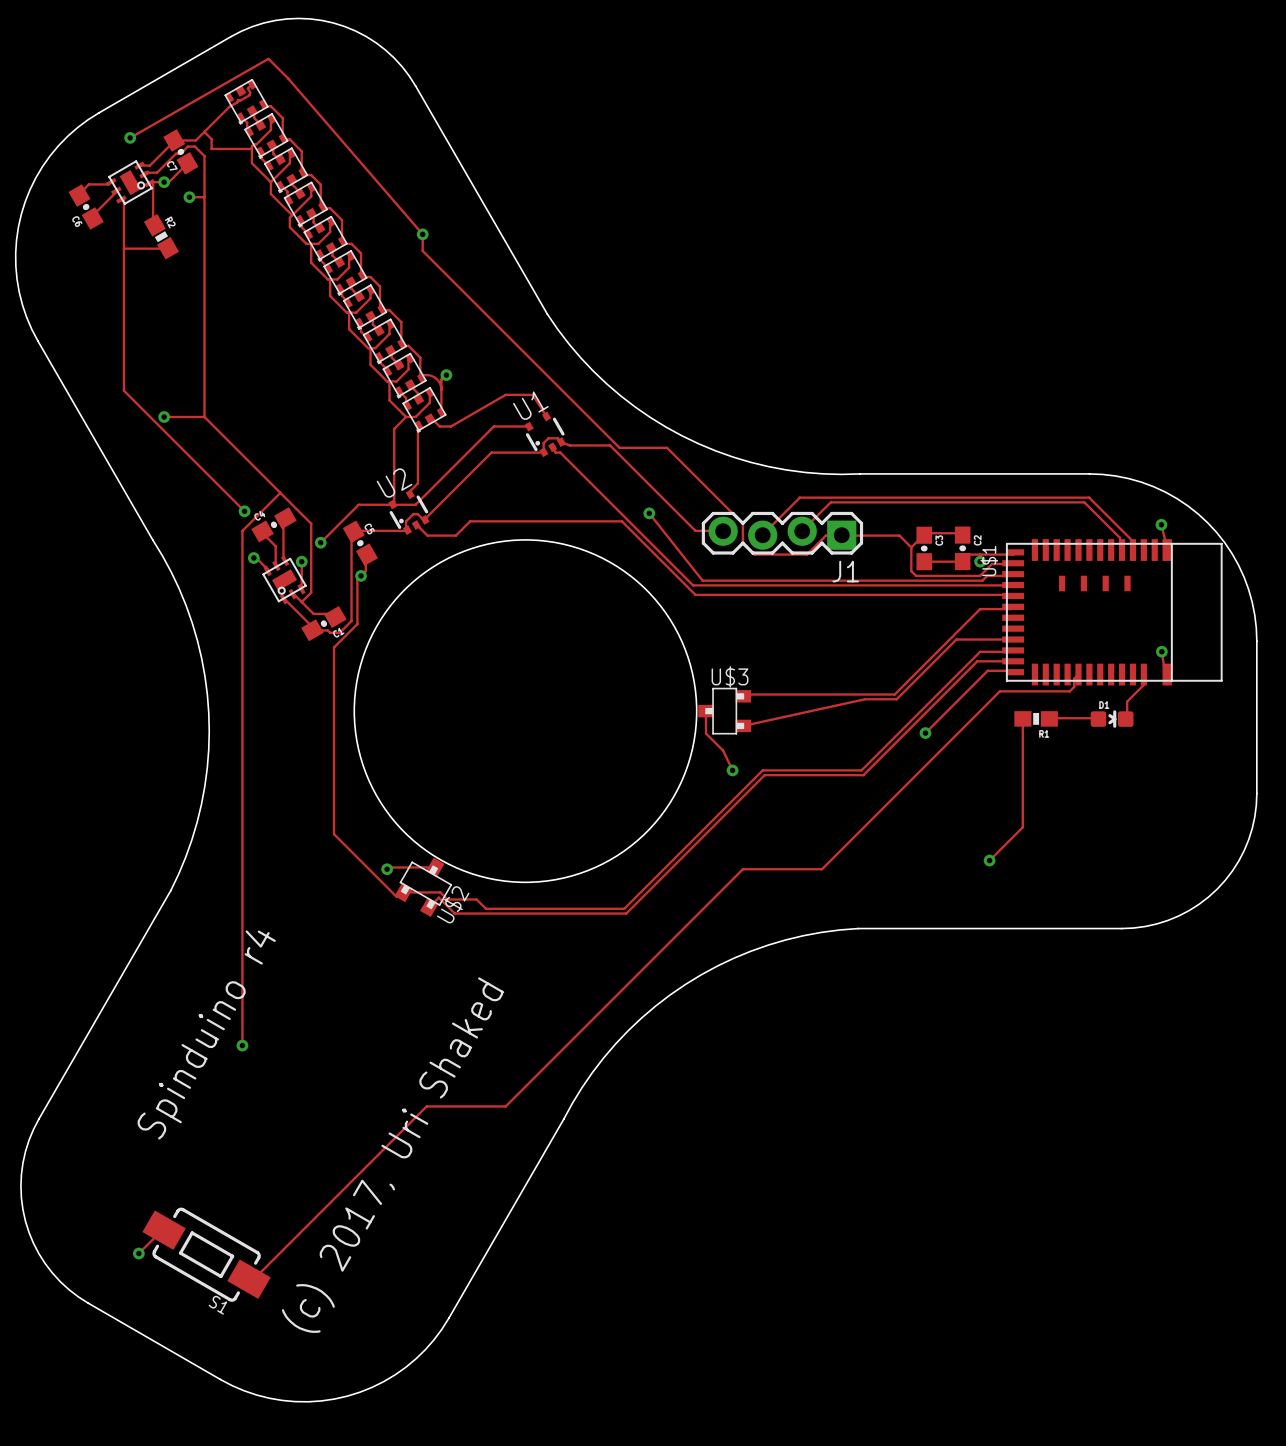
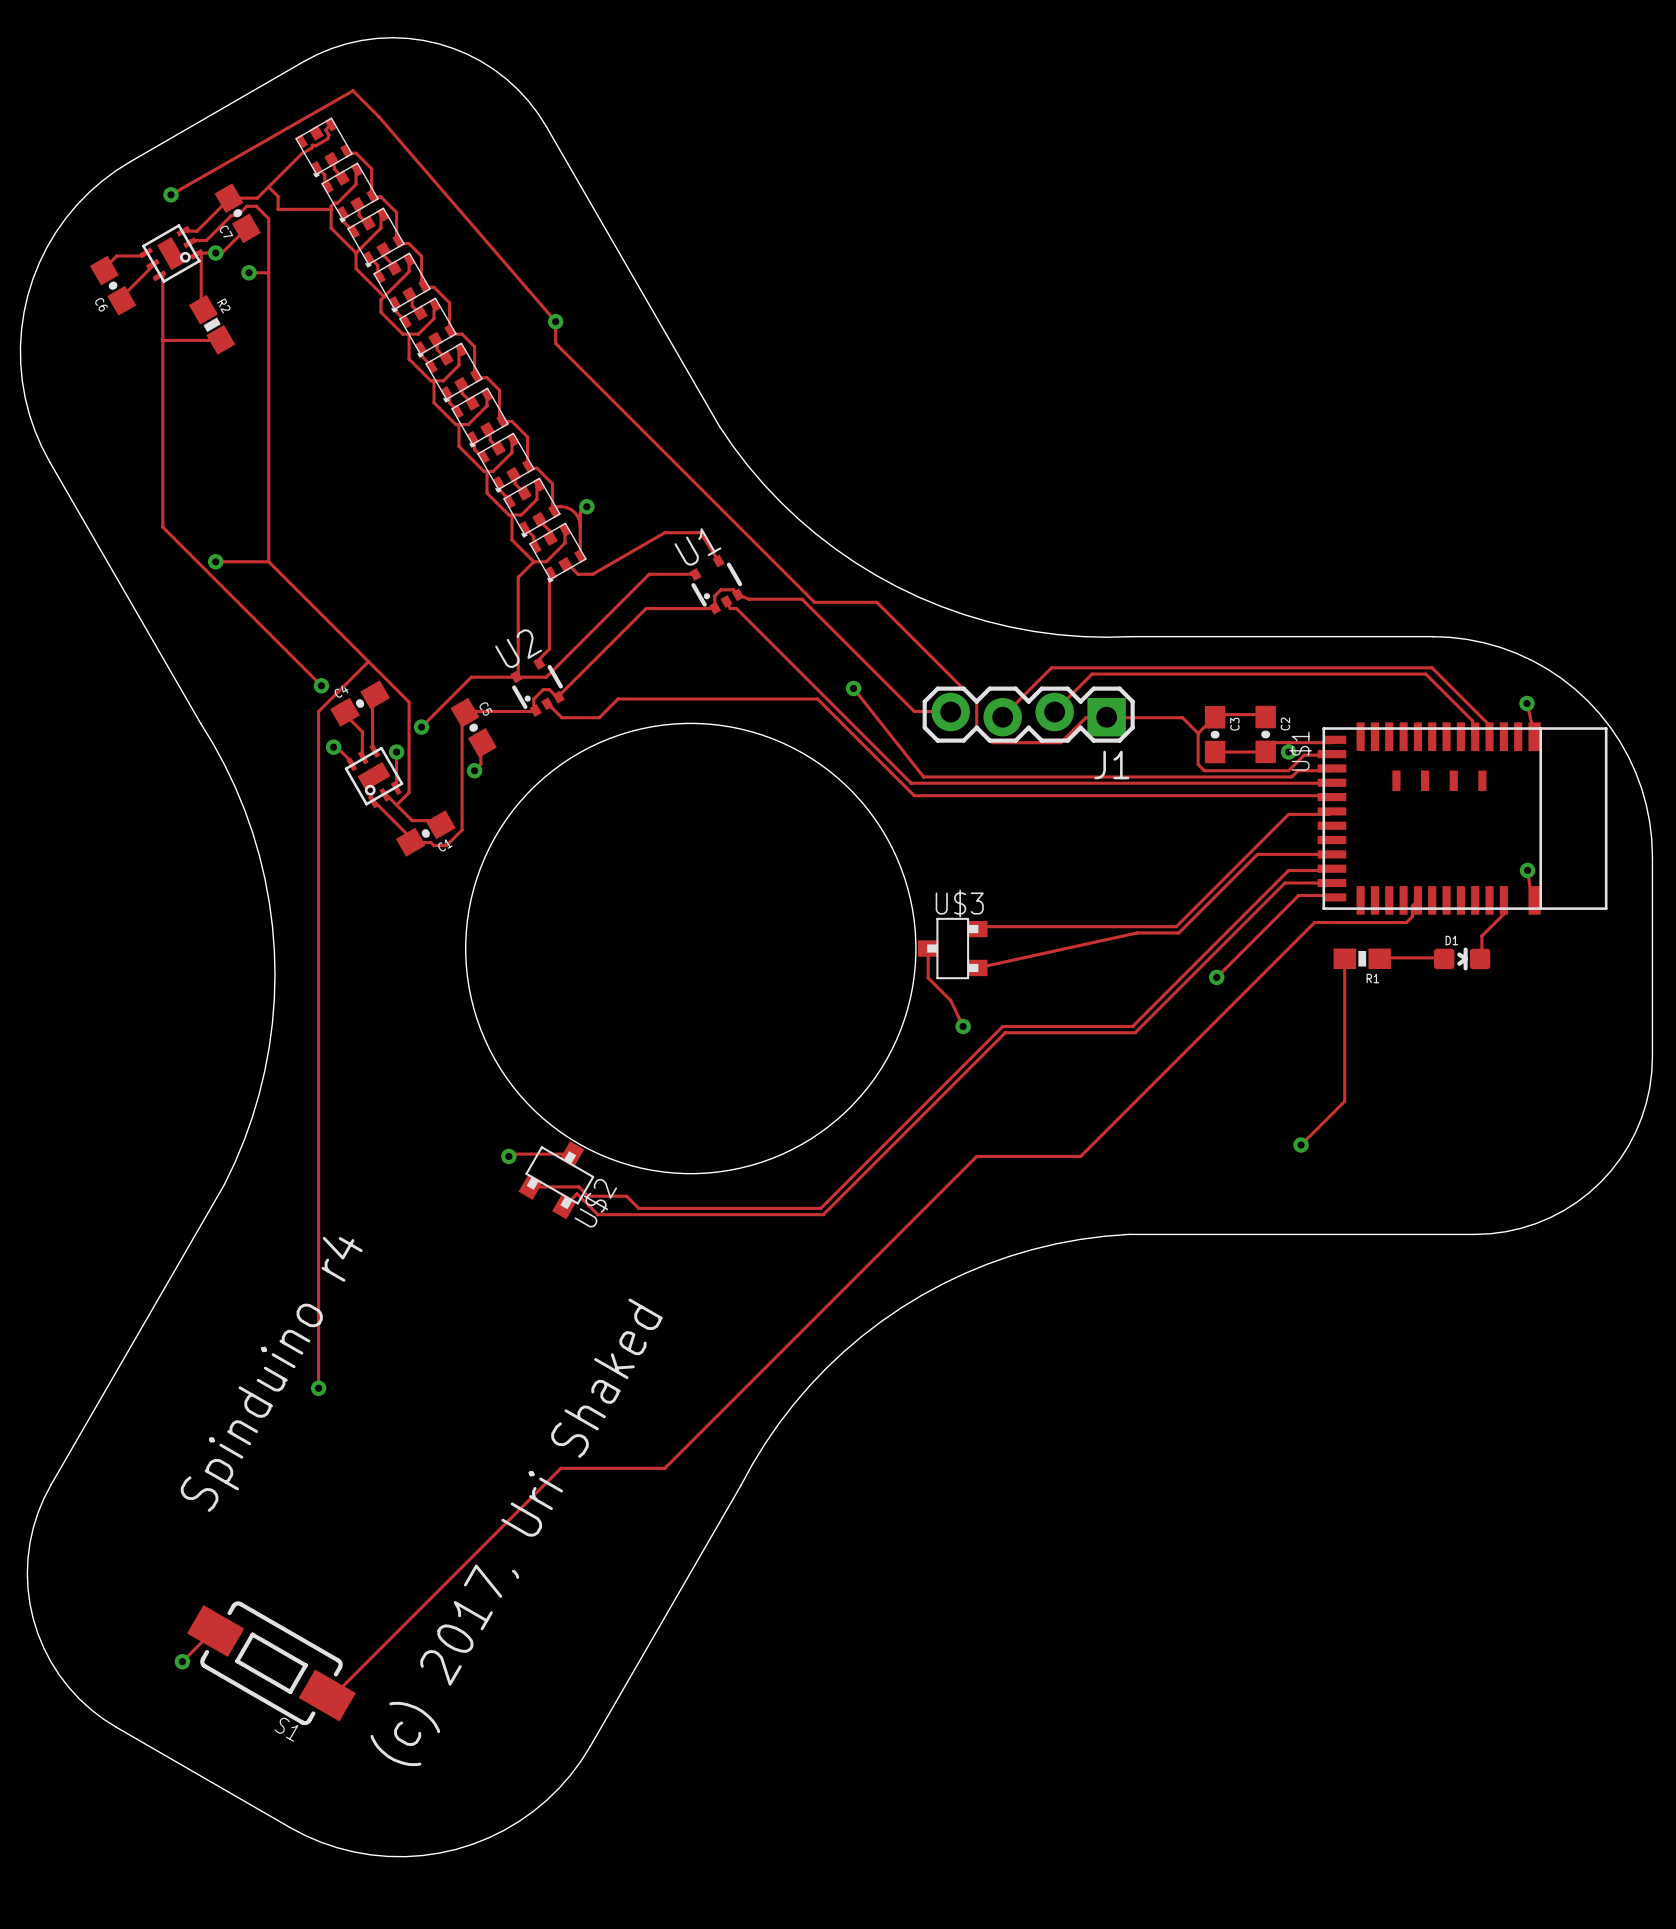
track: (361, 575) (357, 577) (357, 624) (334, 647) (334, 834) (396, 896) (403, 892) -> none

